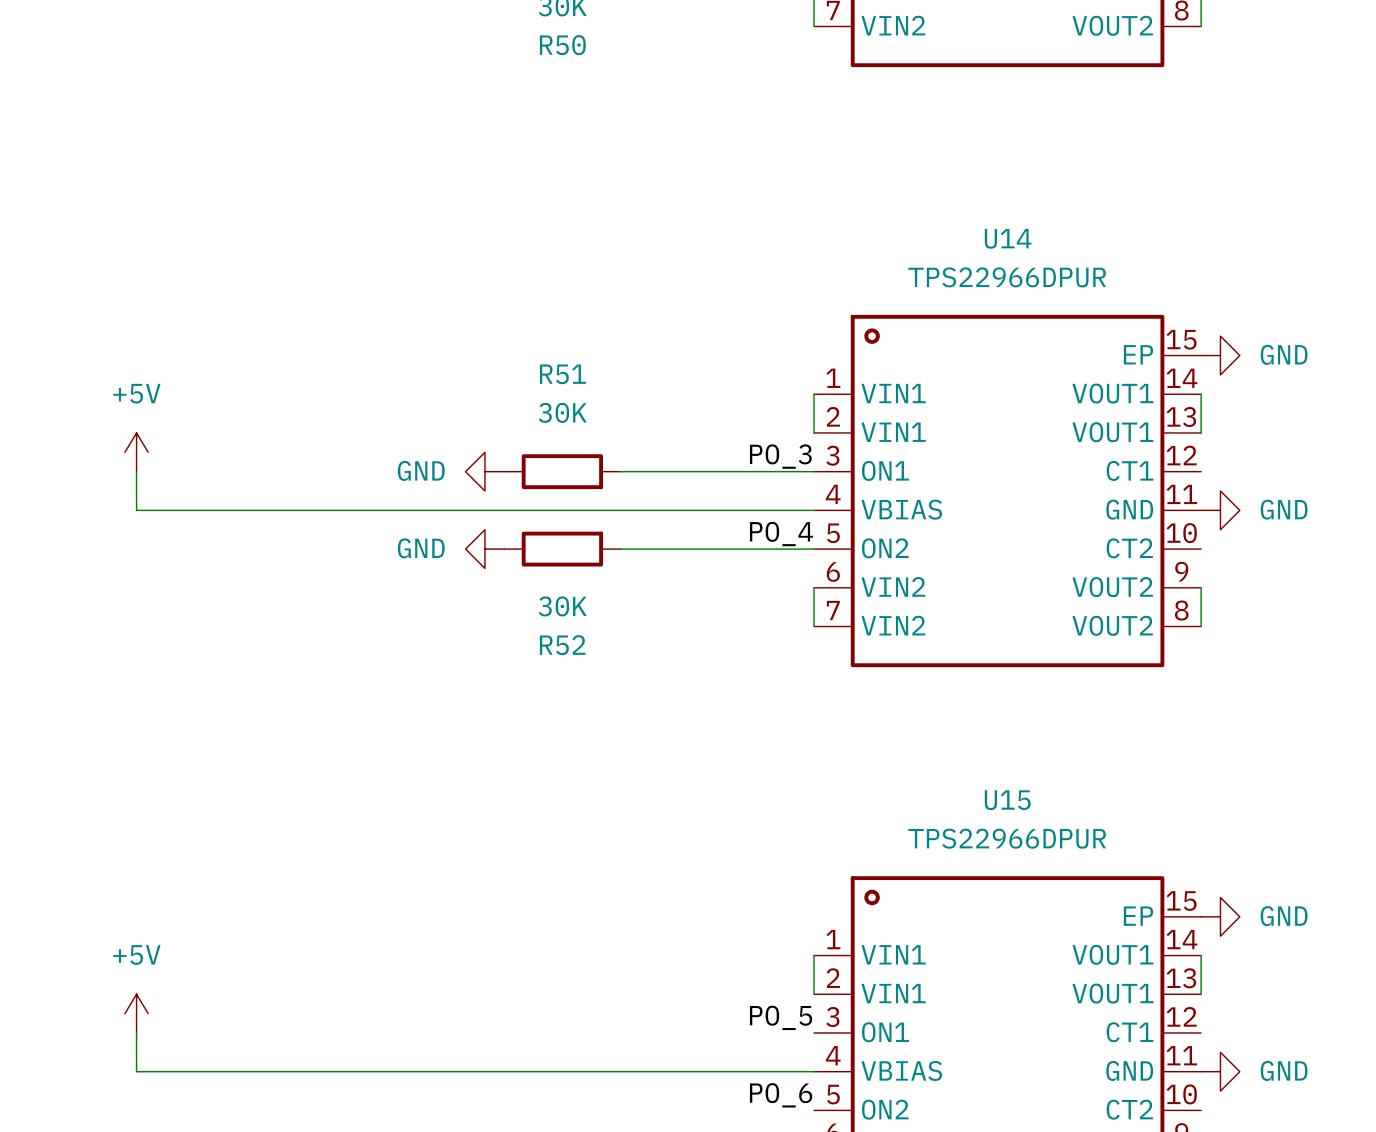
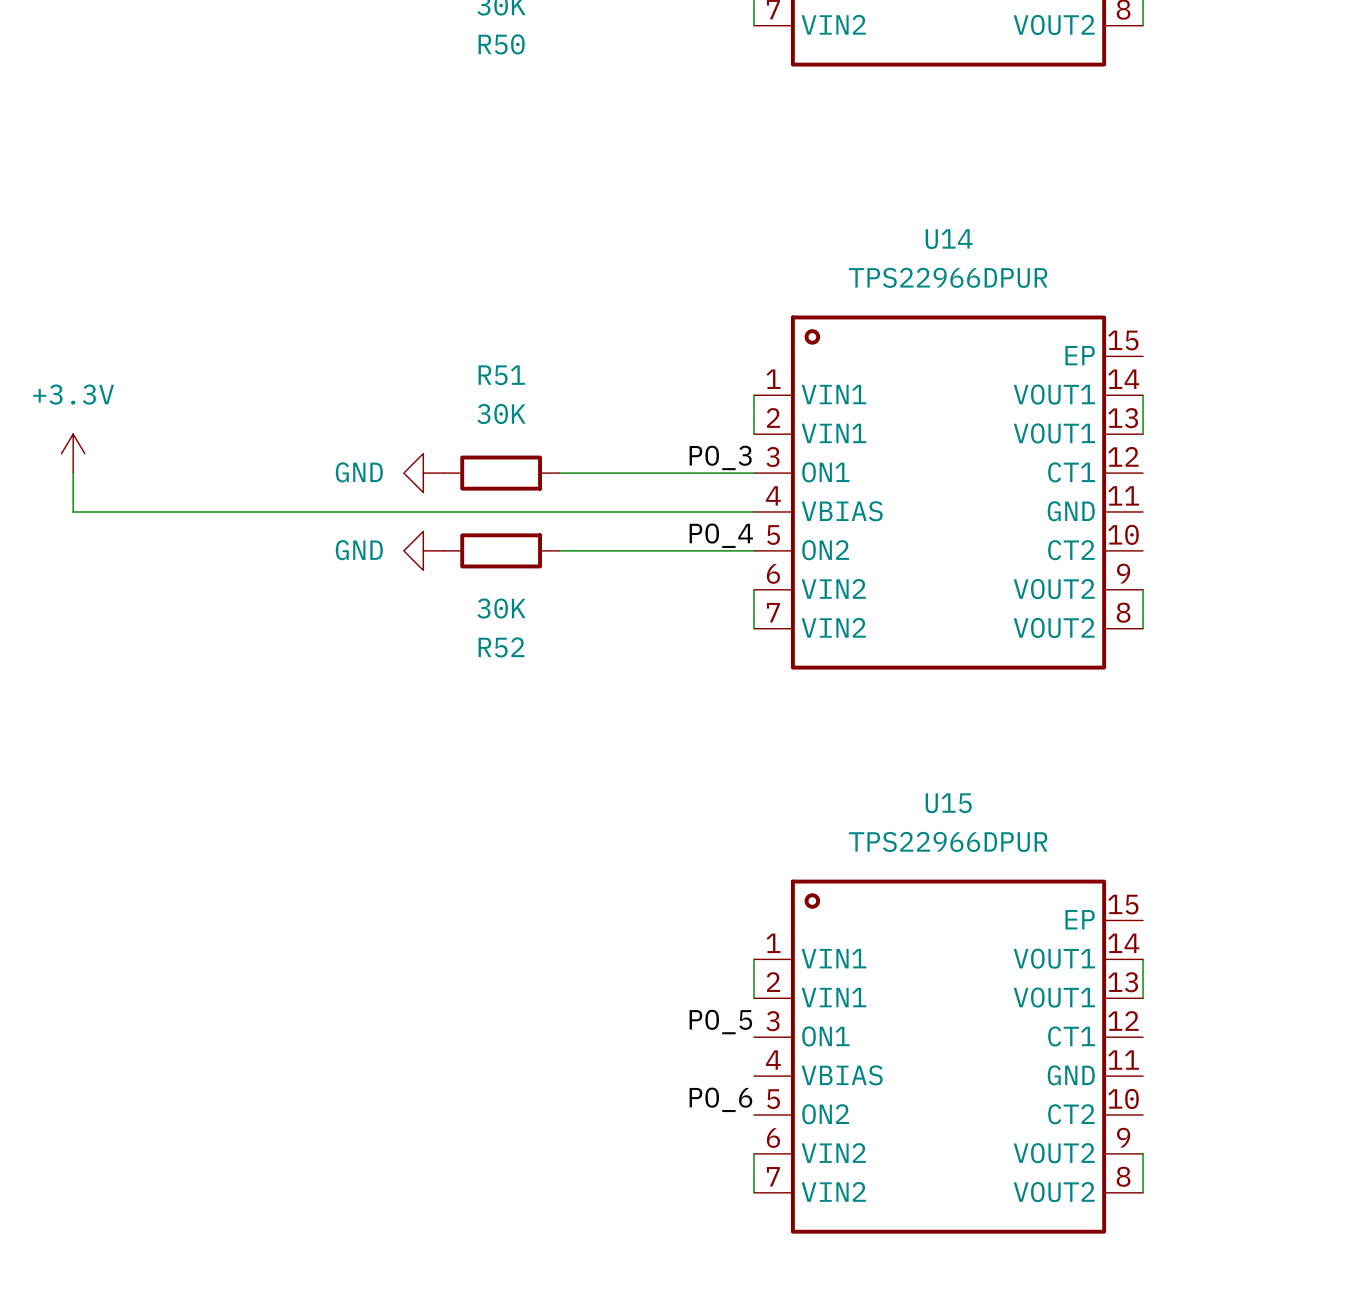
power symbol: GND (1220, 355) -> none
power symbol: +5V (136, 452) -> +3.3V (73, 453)
power symbol: GND (1220, 510) -> none
power symbol: GND (1220, 916) -> none
power symbol: +5V (136, 1013) -> none
wire: (136, 1032) (136, 1071) (814, 1071) -> none
power symbol: GND (1220, 1071) -> none

